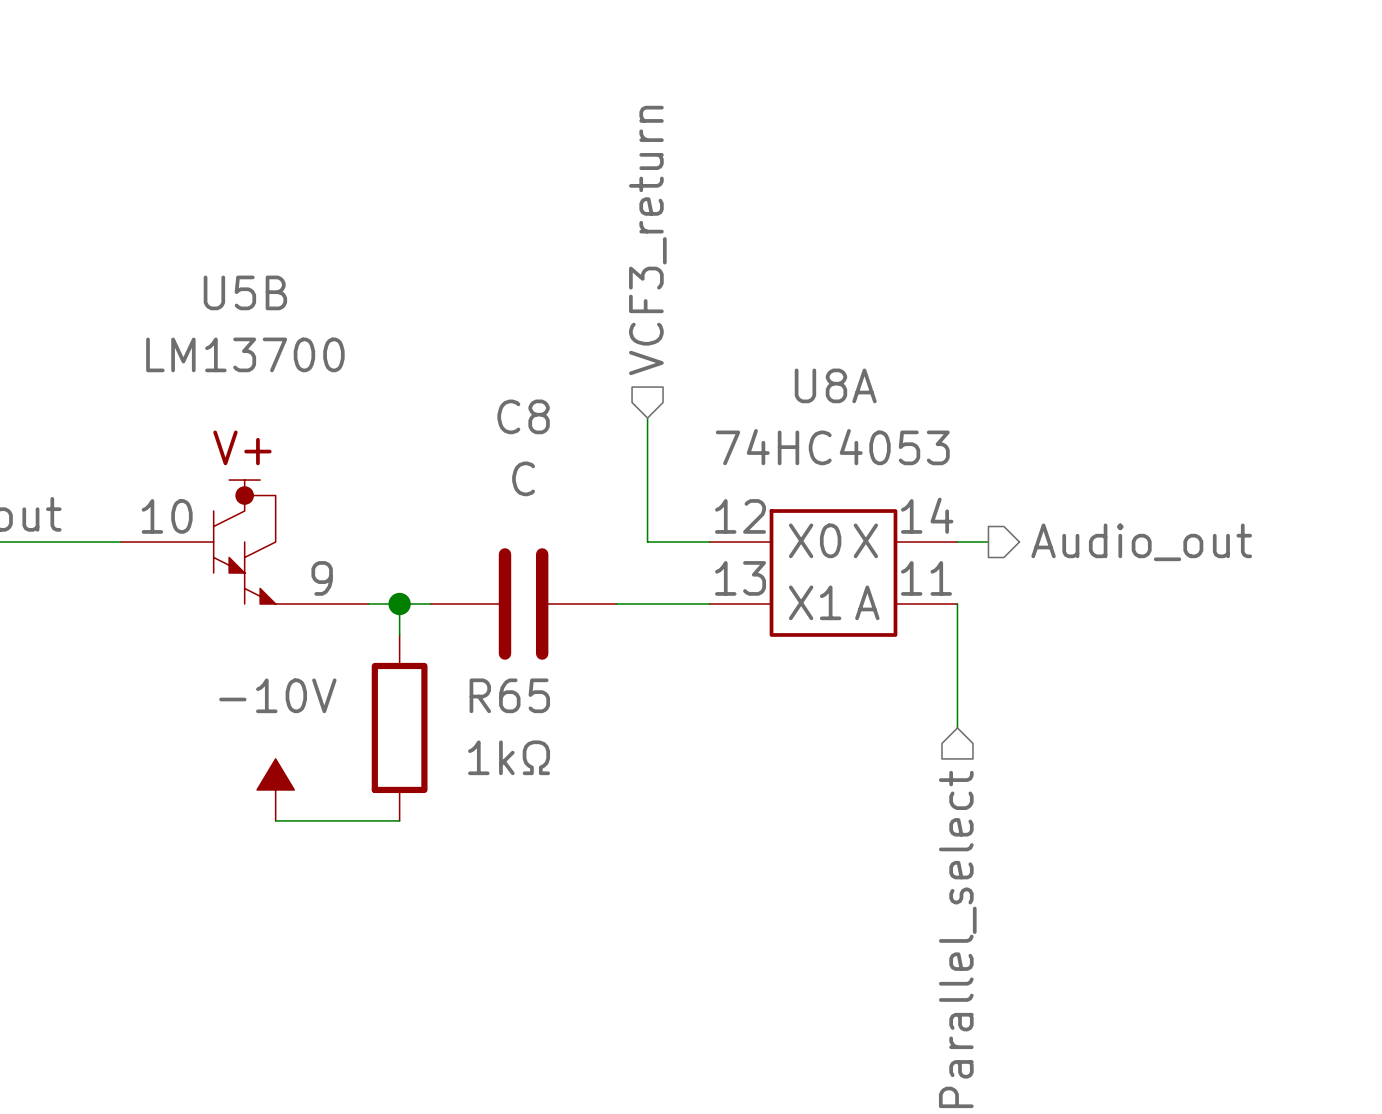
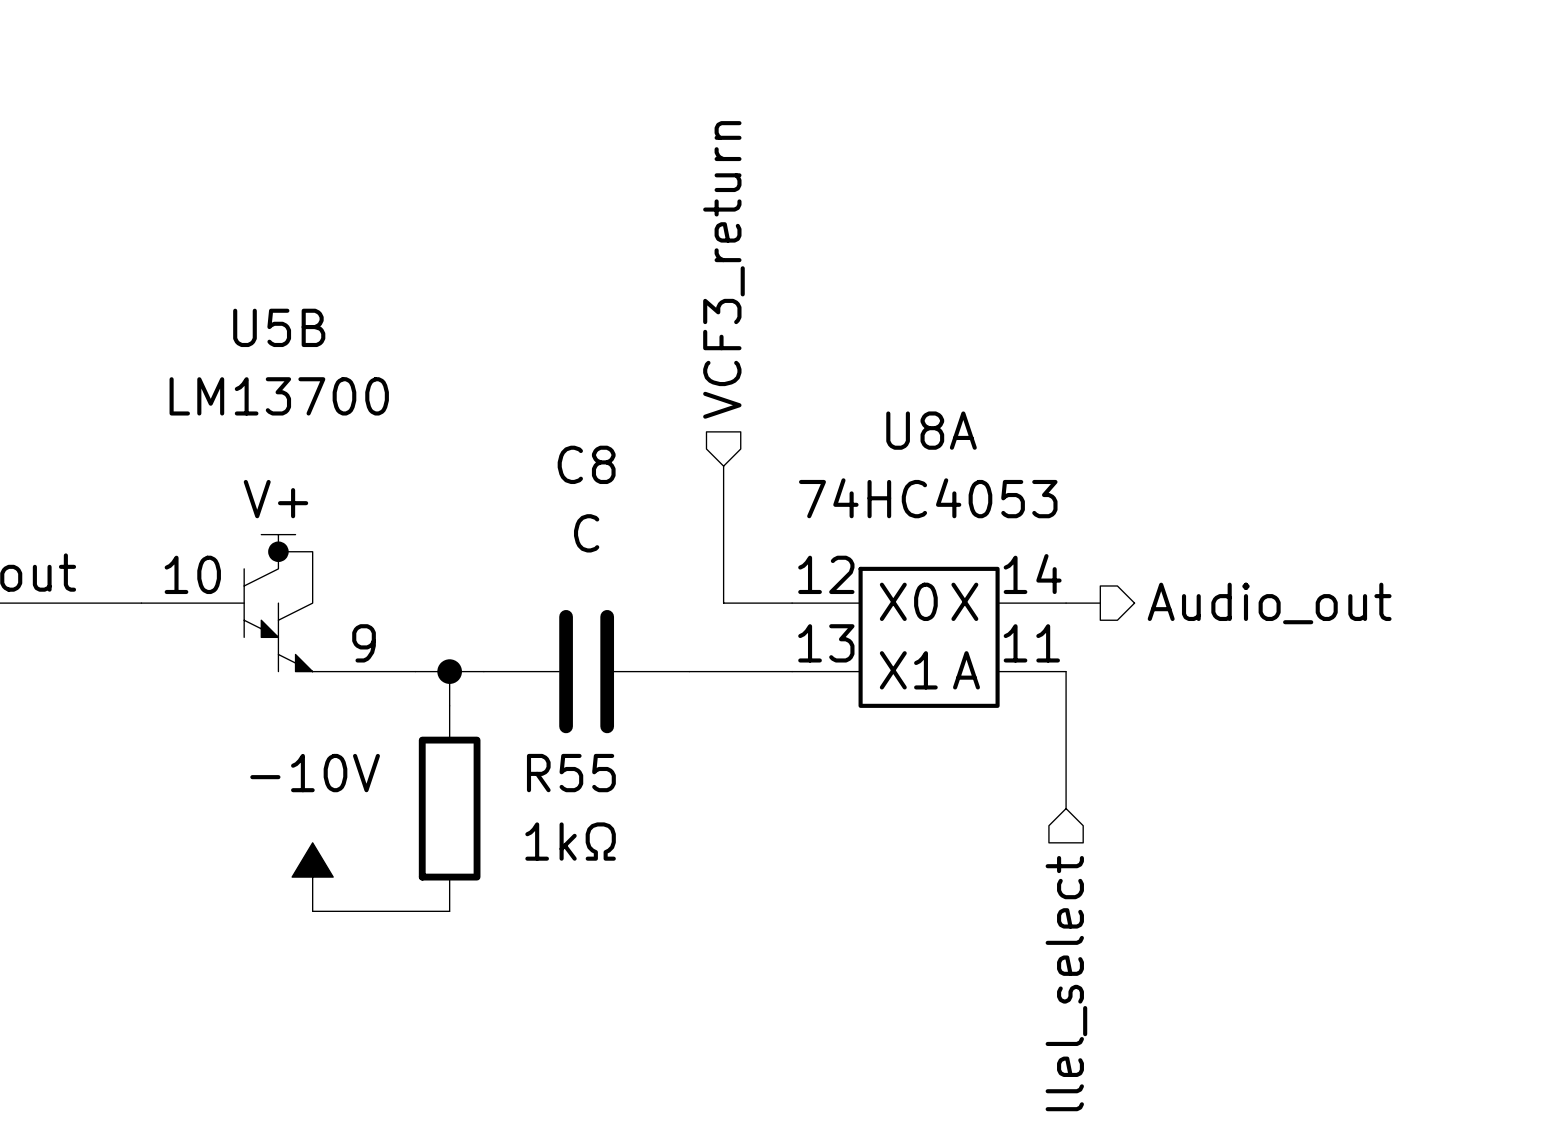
R65 name: R65 (509, 695) -> R55 (571, 773)

